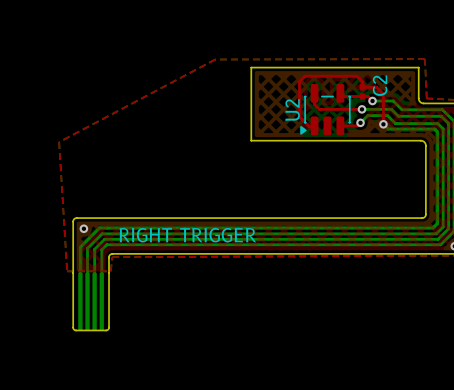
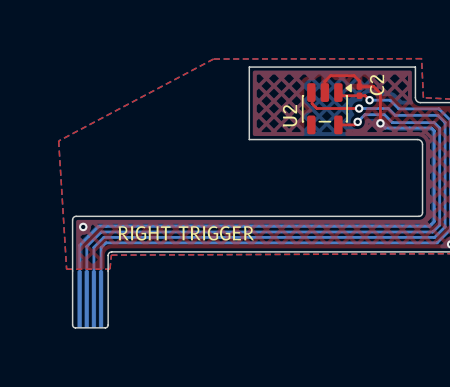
top track: (333, 76) (305, 76) (299, 81) (299, 116) (308, 126) (314, 125) -> (330, 75) (324, 81) (324, 92)
U2 footprint: [300, 83, 351, 136] -> [301, 83, 352, 135]

